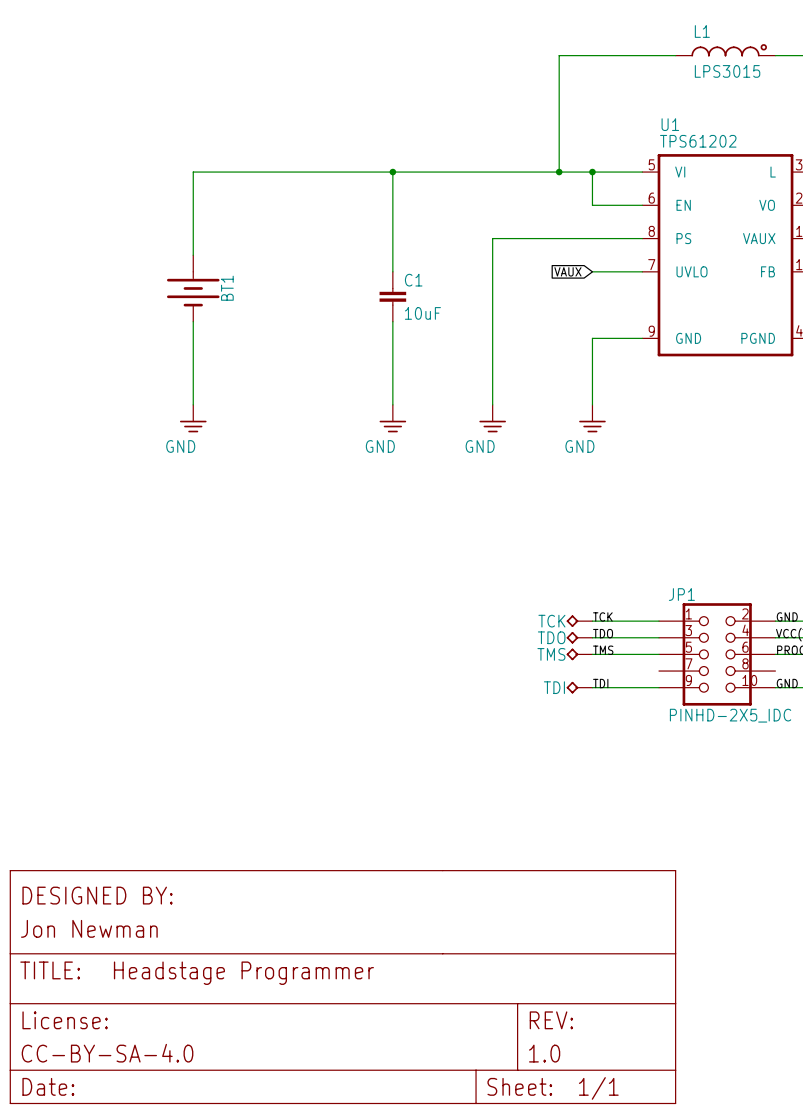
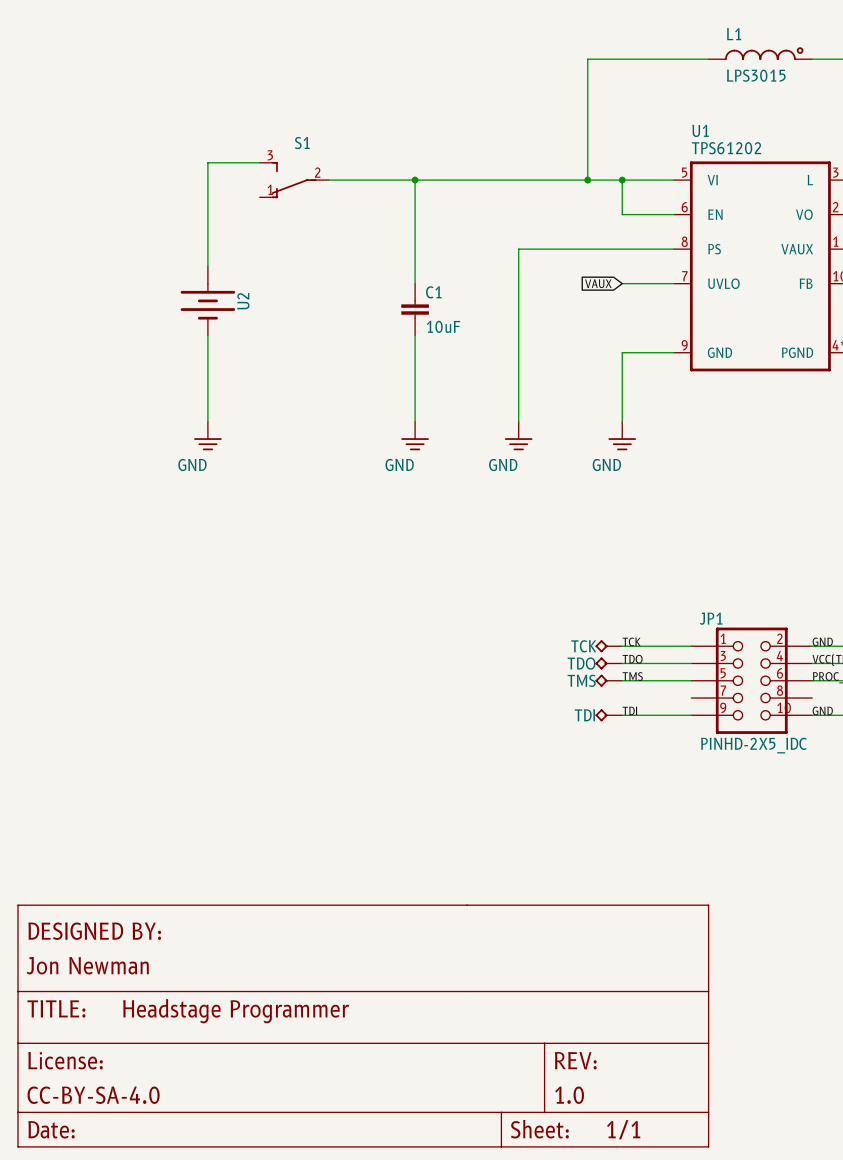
wire: (193, 172) (309, 172) -> (207, 180) (207, 162) (259, 162)
S1: none -> (294, 180)
BT1 name: BT1 (227, 288) -> U2 (243, 301)

